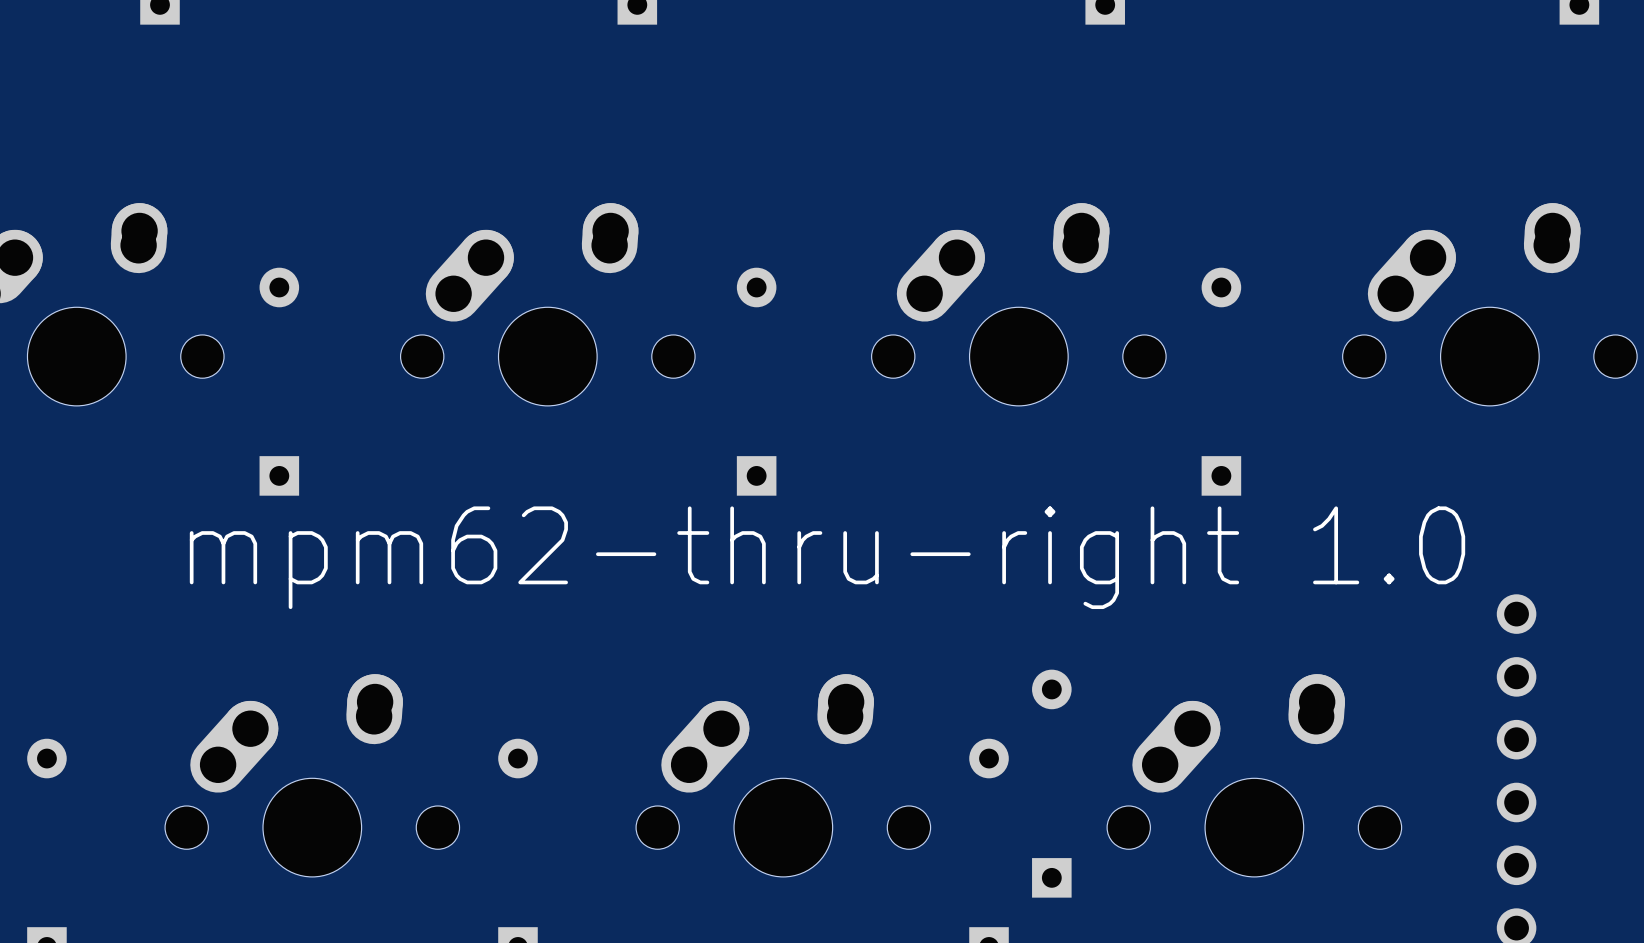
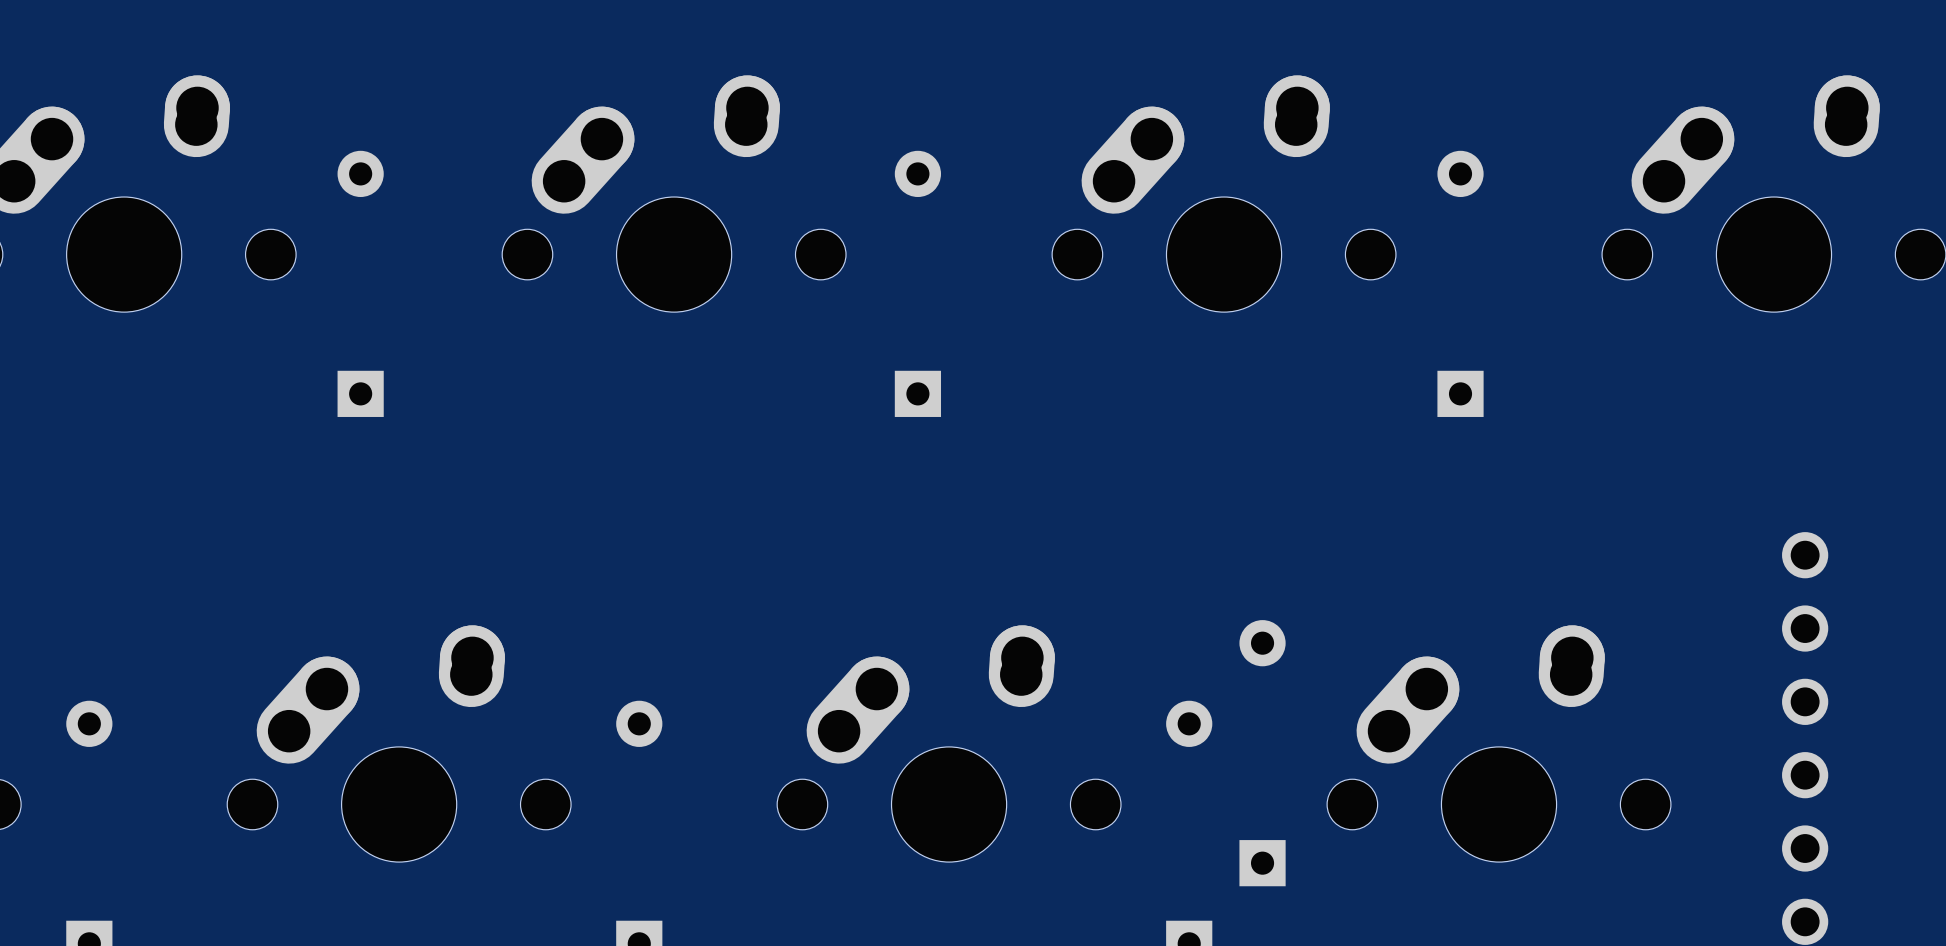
text: mpm62-thru-right 1.0 (827, 557) -> none

